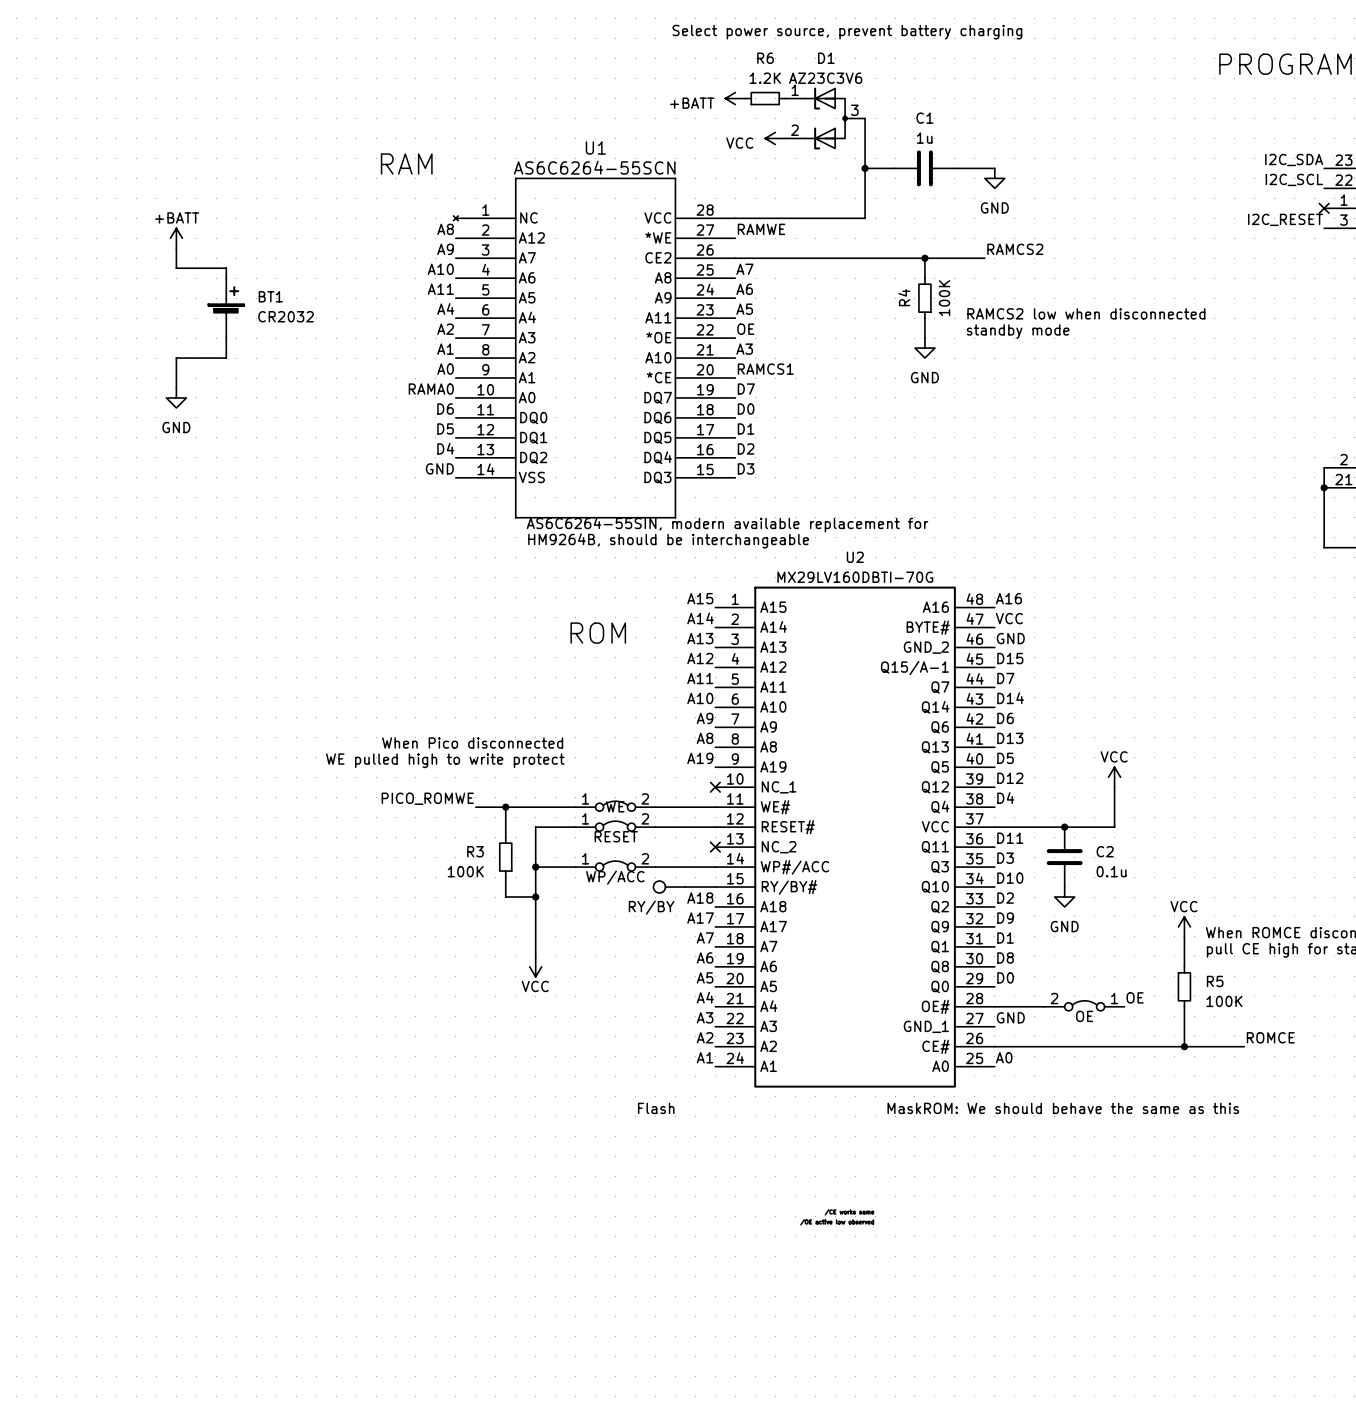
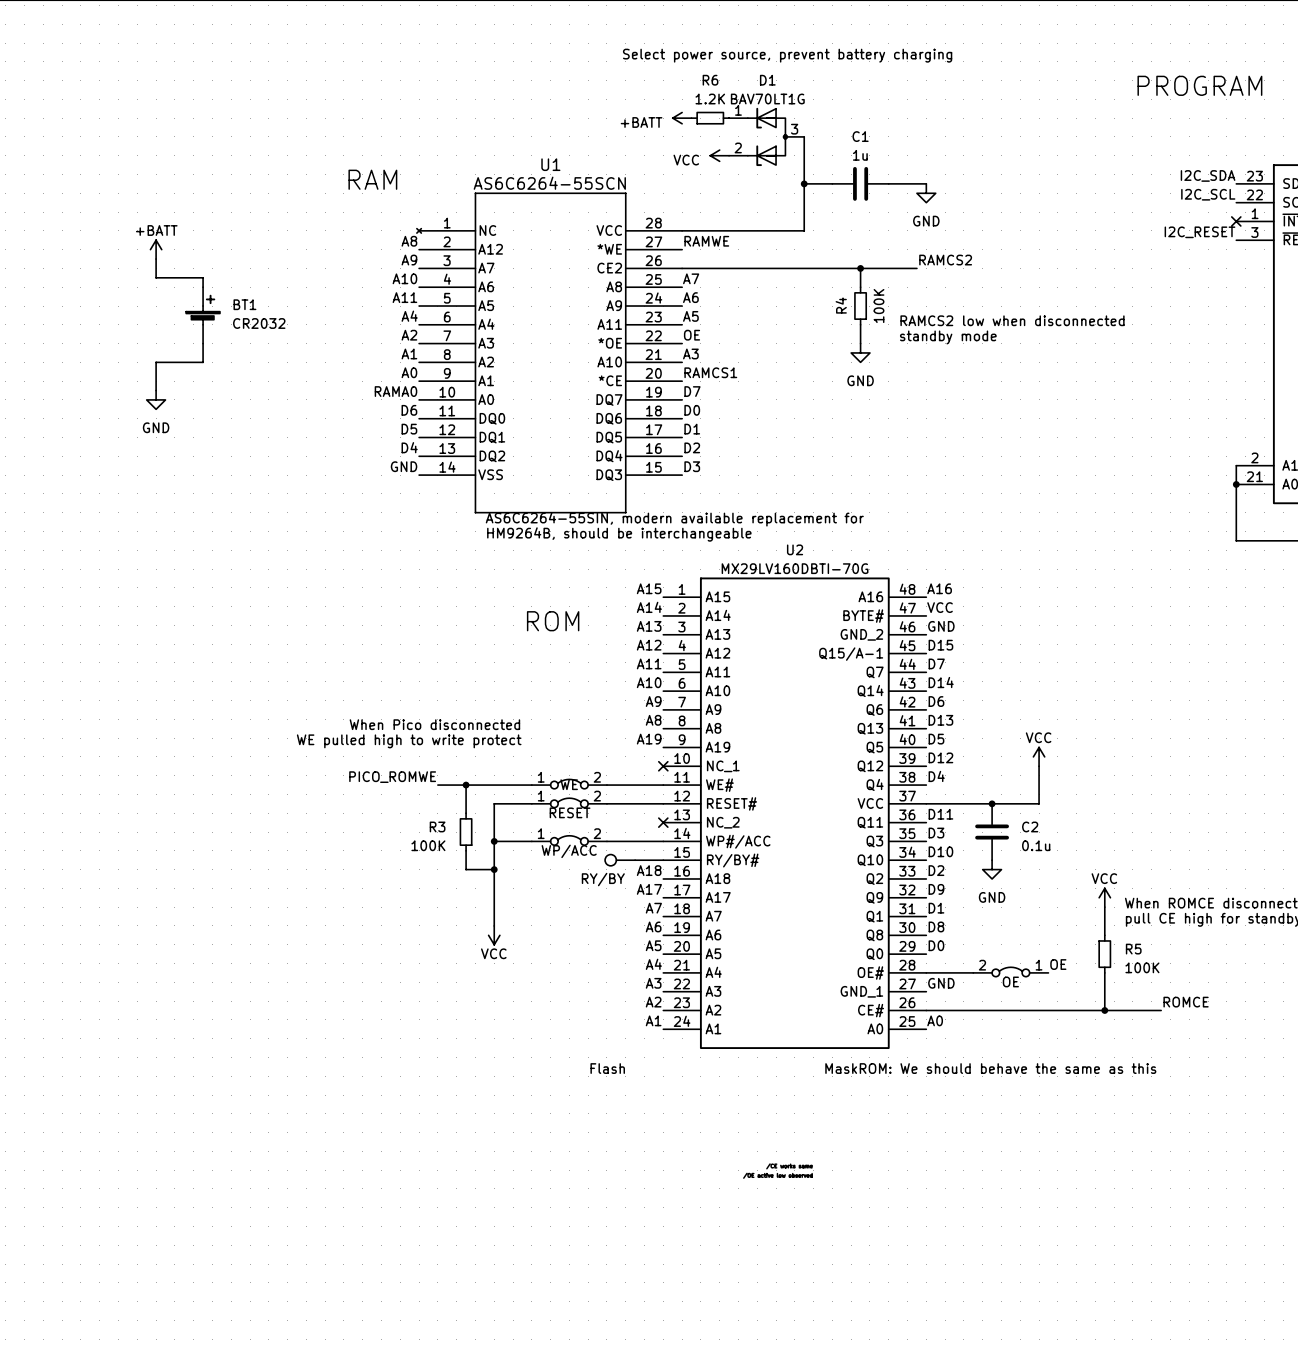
D1 value: AZ23C3V6 (825, 78) -> BAV70LT1G (767, 99)

